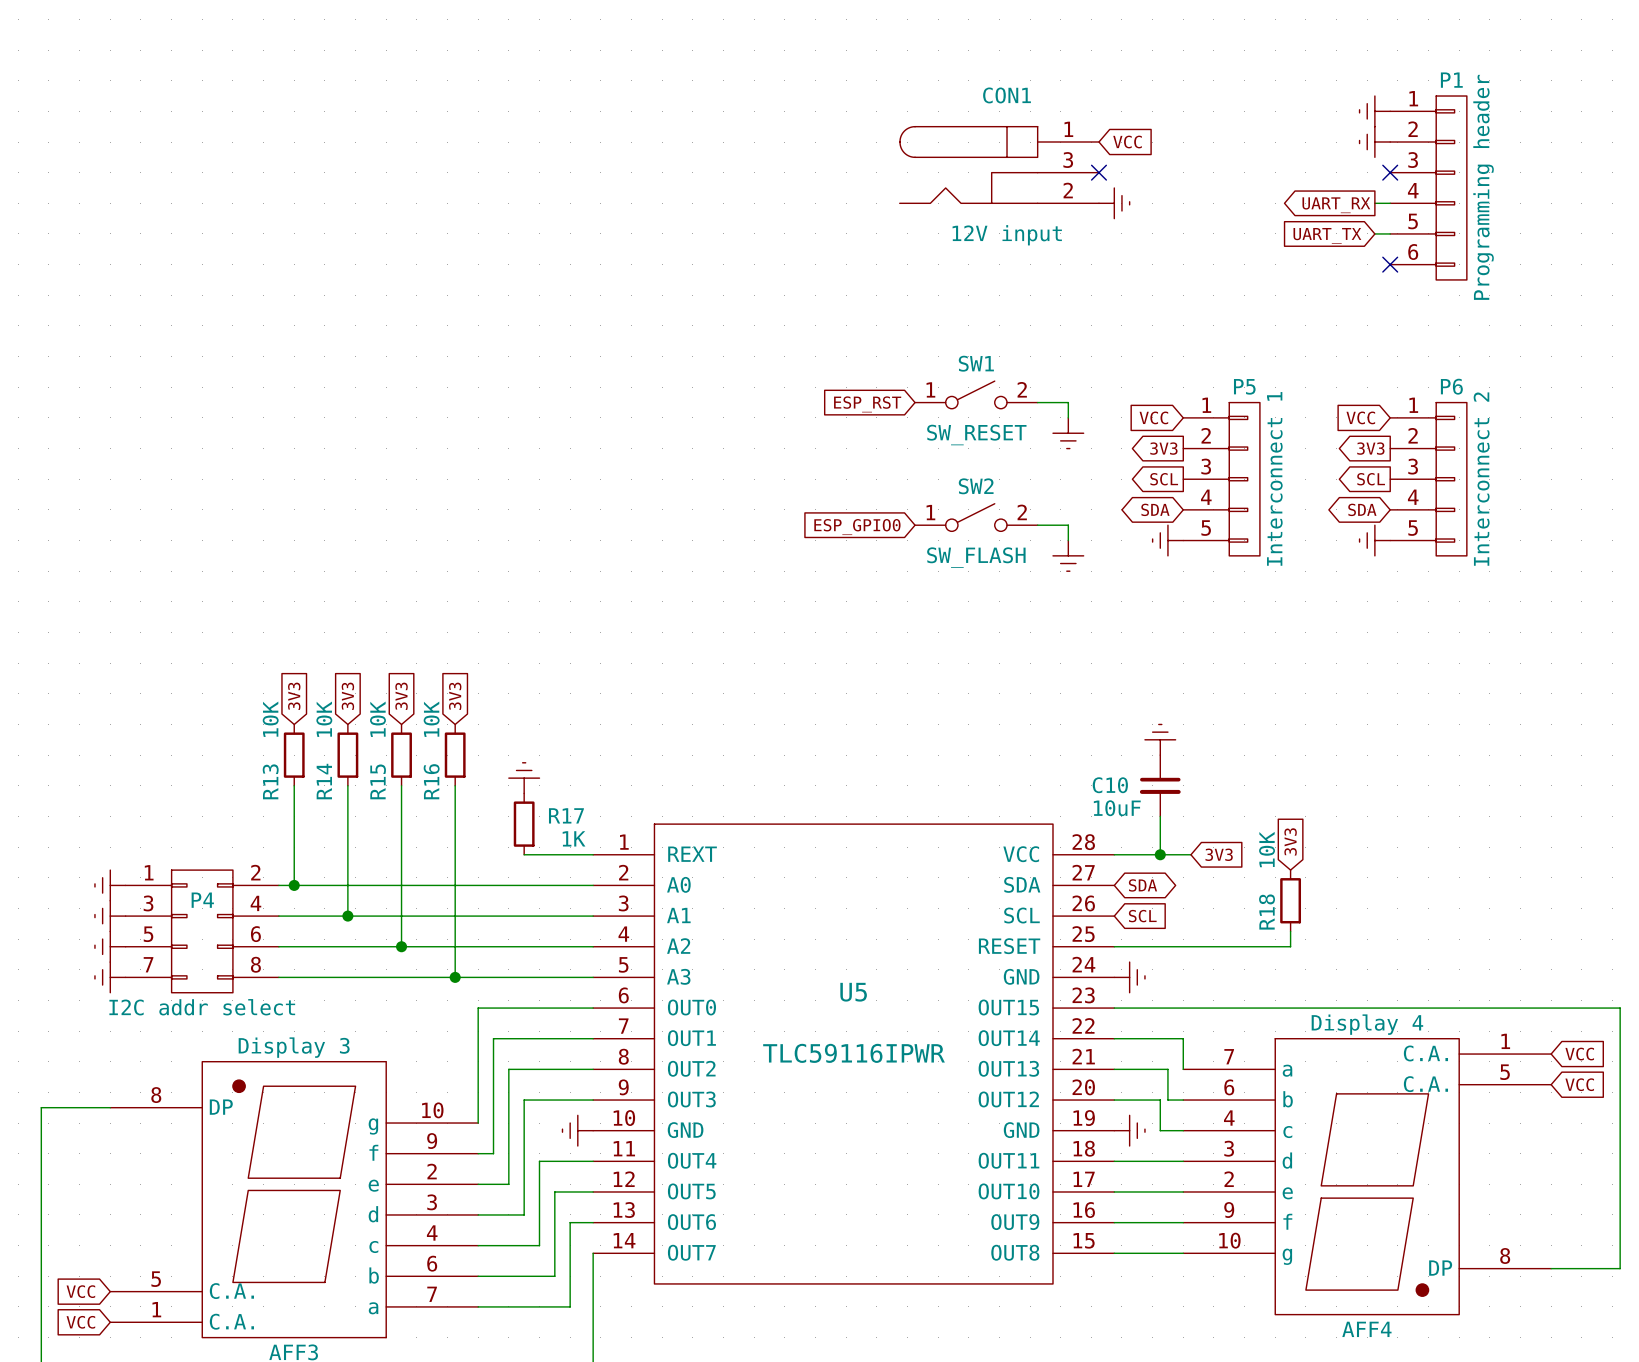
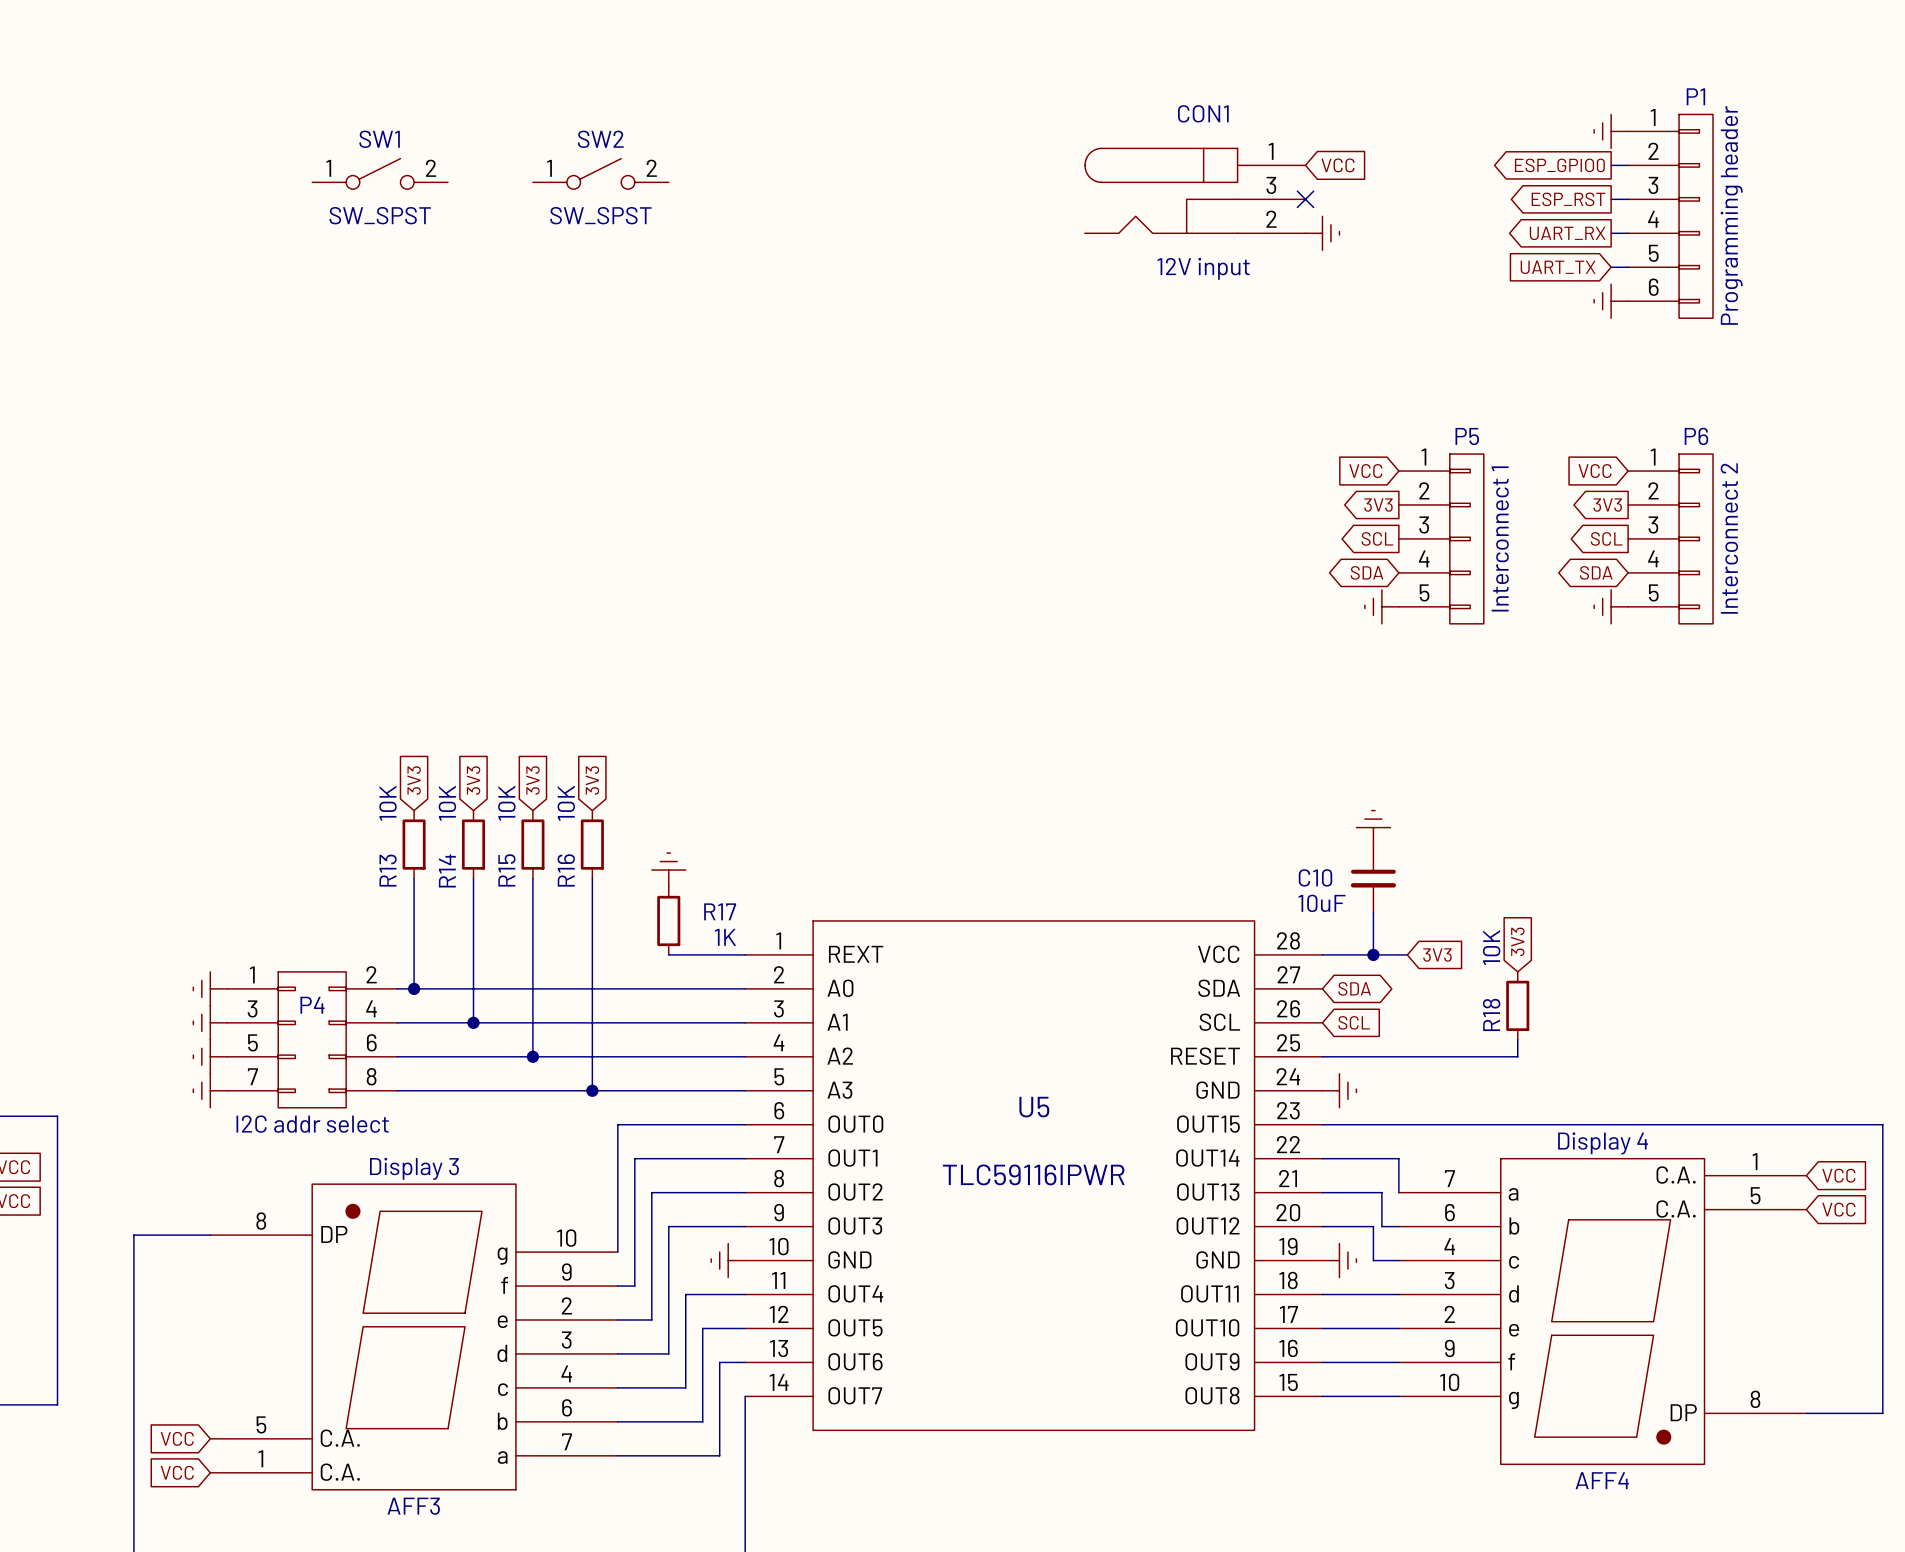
power symbol position: (1374, 142) -> (1611, 301)
global label: none -> ESP_GPIO0 (1559, 165)
wire: none -> (1611, 199) (1628, 199)
no-connect mark: (1390, 172) -> none
global label: none -> ESP_RST (1568, 199)
no-connect mark: (1390, 264) -> none
SW1 position: (976, 394) -> (380, 173)
wire: (1037, 402) (1068, 402) (1068, 417) -> none
global label: ESP_RST (867, 404) -> none
power symbol: (1068, 433) -> none
SW1 value: SW_RESET (976, 435) -> SW_SPST (380, 215)
SW2 position: (976, 517) -> (600, 173)
wire: (1037, 525) (1068, 525) (1068, 540) -> none
global label: ESP_GPIO0 (857, 527) -> none
power symbol: (1068, 555) -> none
SW2 value: SW_FLASH (976, 557) -> SW_SPST (600, 215)

